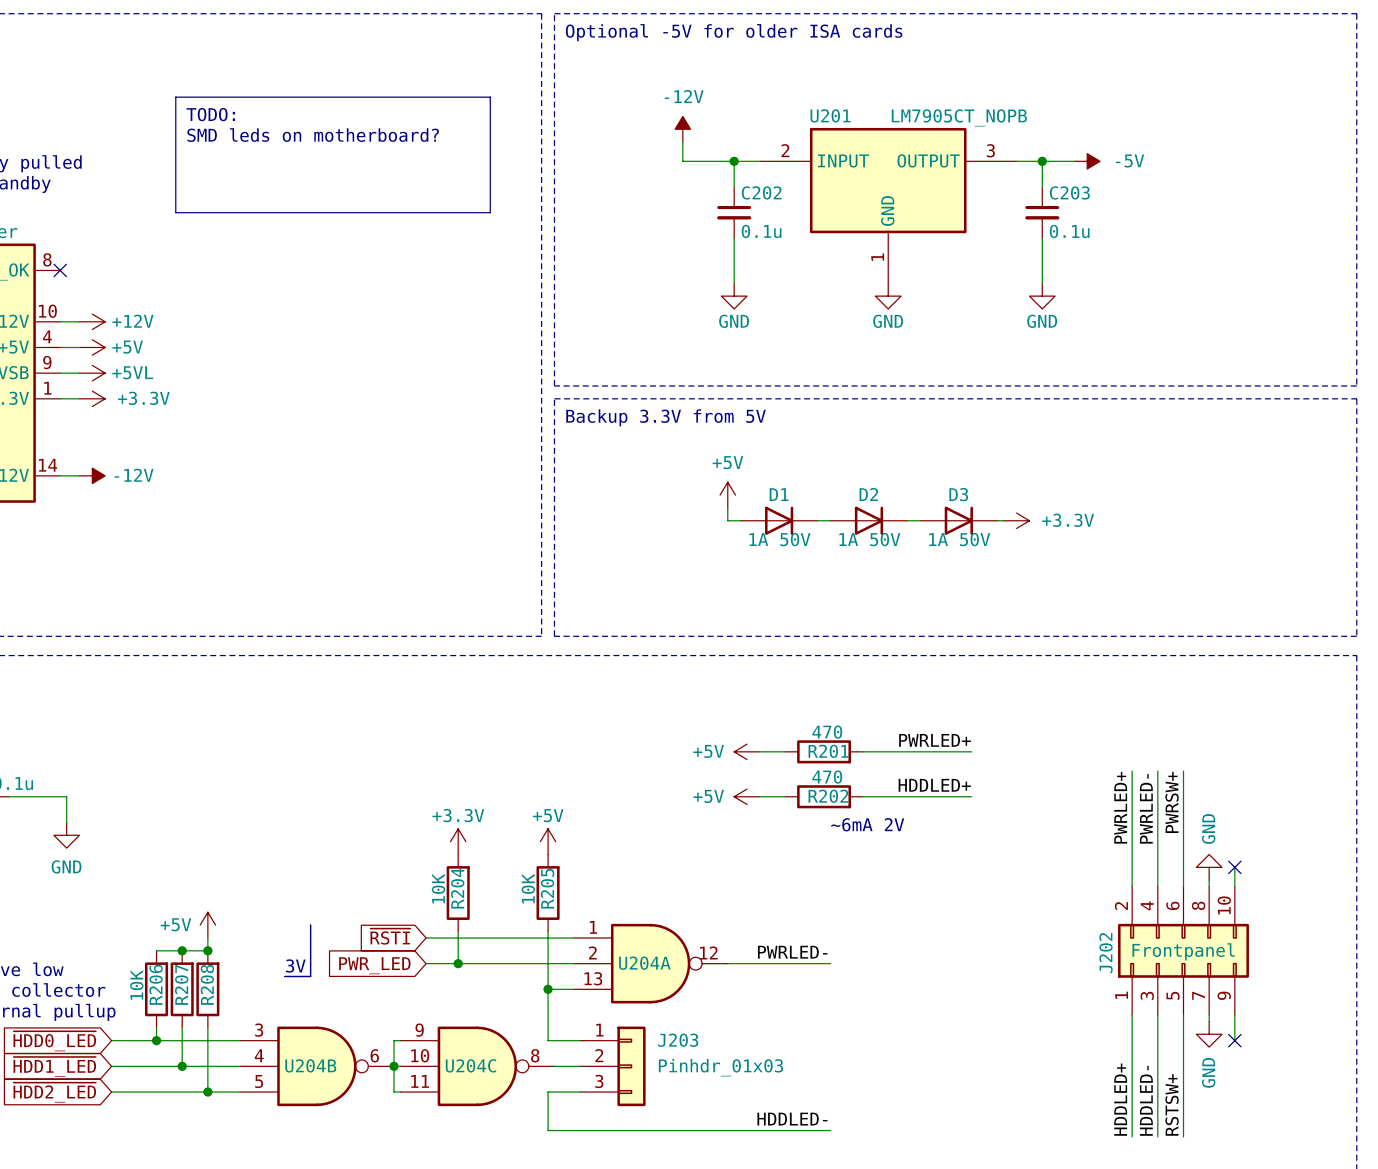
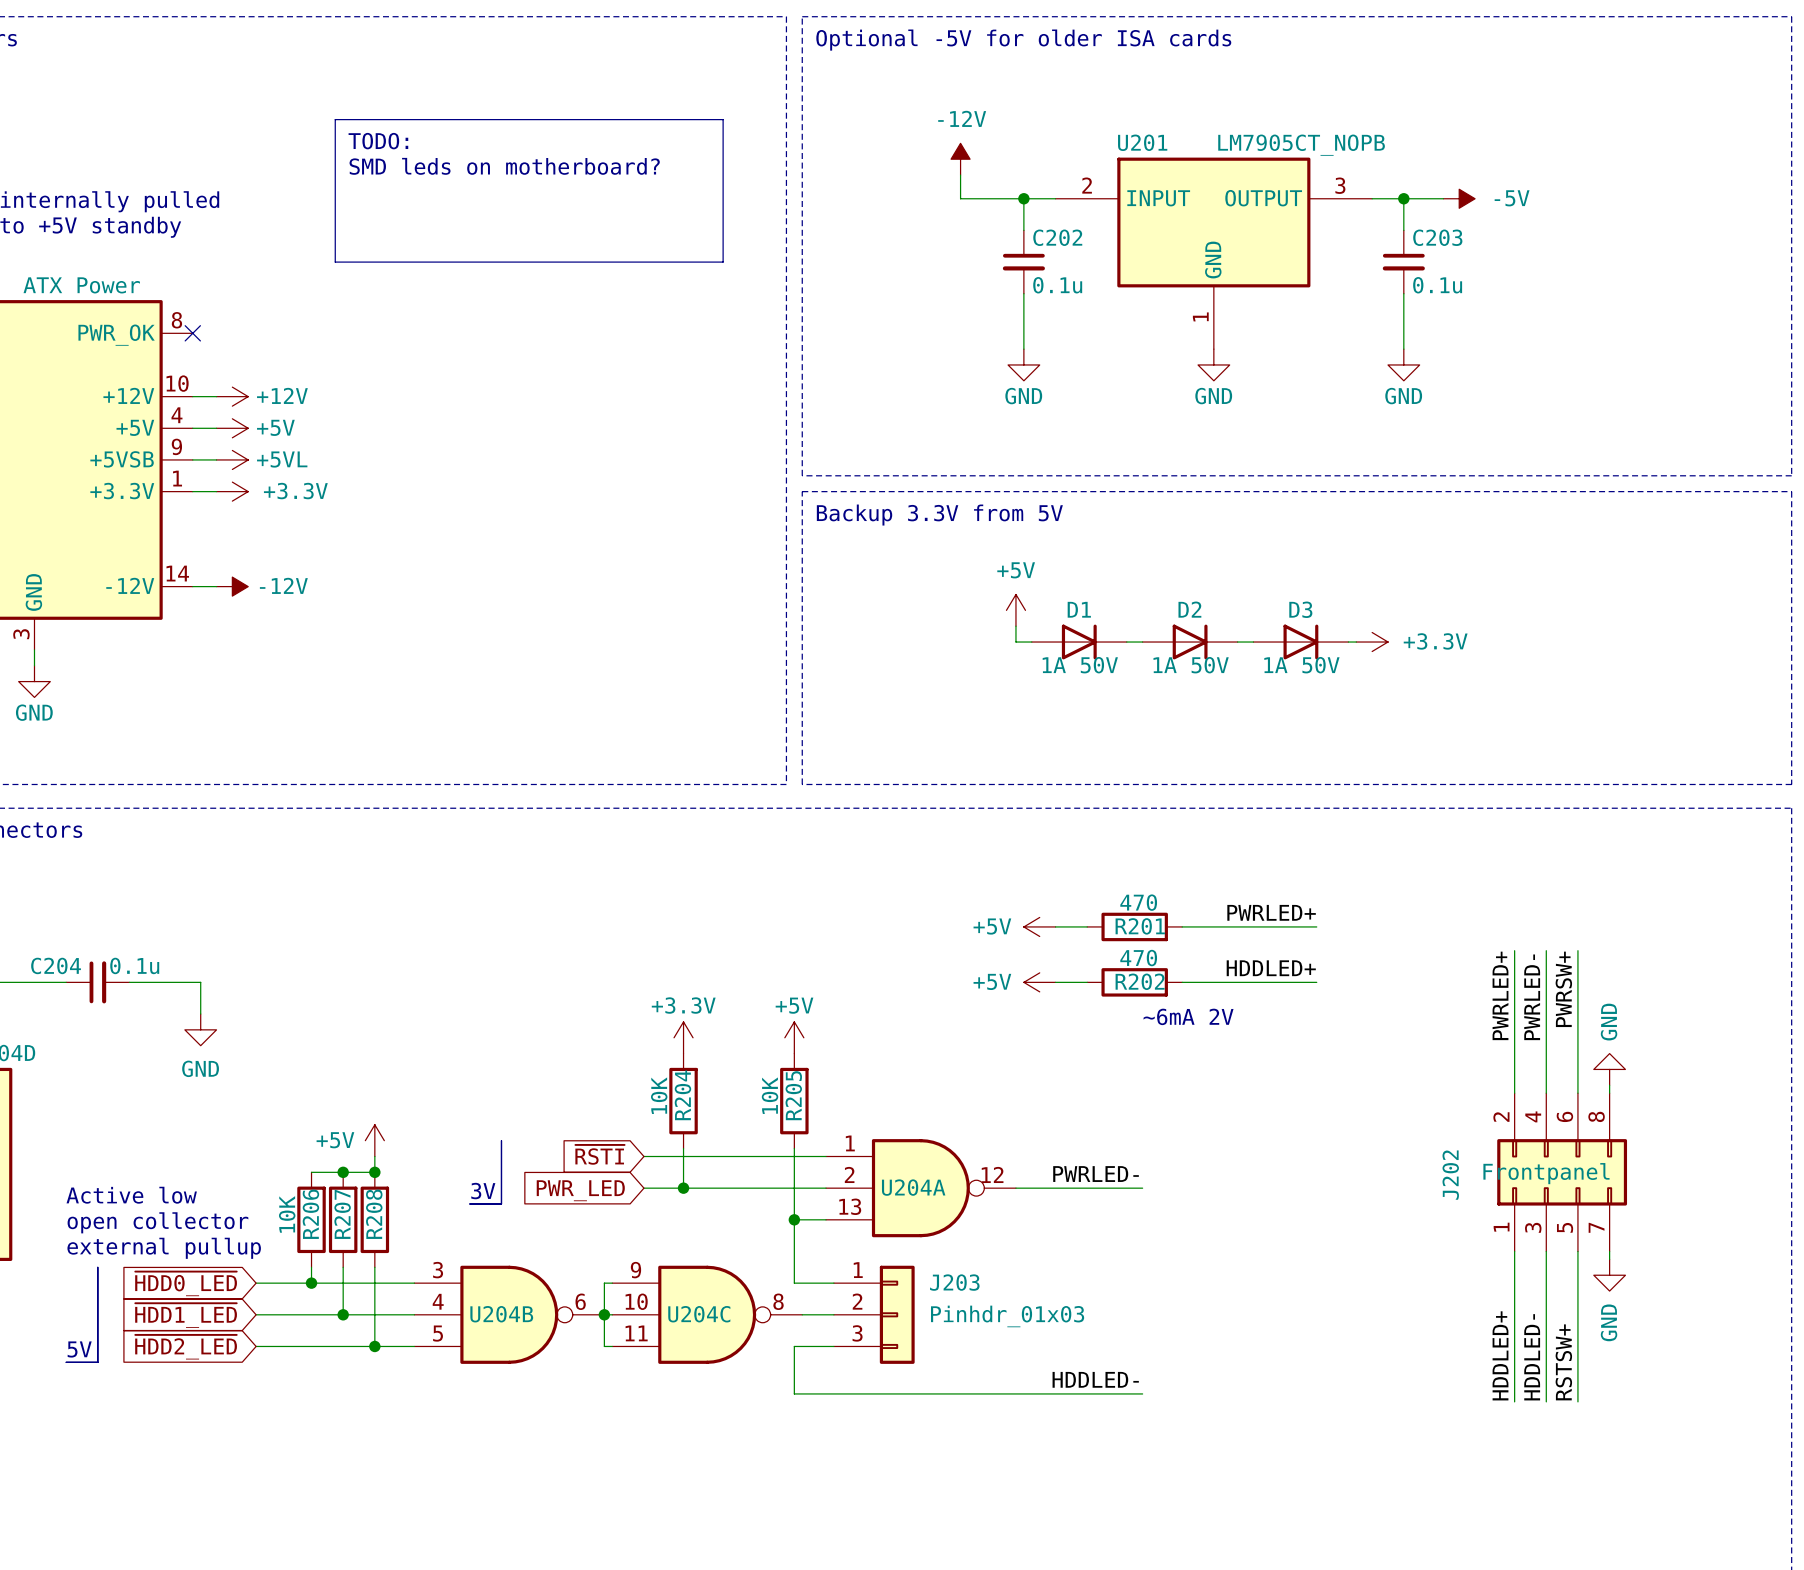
wire: (1234, 867) (1234, 886) -> none
no-connect mark: (1234, 867) -> none
J202 symbol: [1118, 886, 1249, 1016] -> [1497, 1093, 1628, 1252]
wire: (1234, 1015) (1234, 1040) -> none
no-connect mark: (1234, 1040) -> none

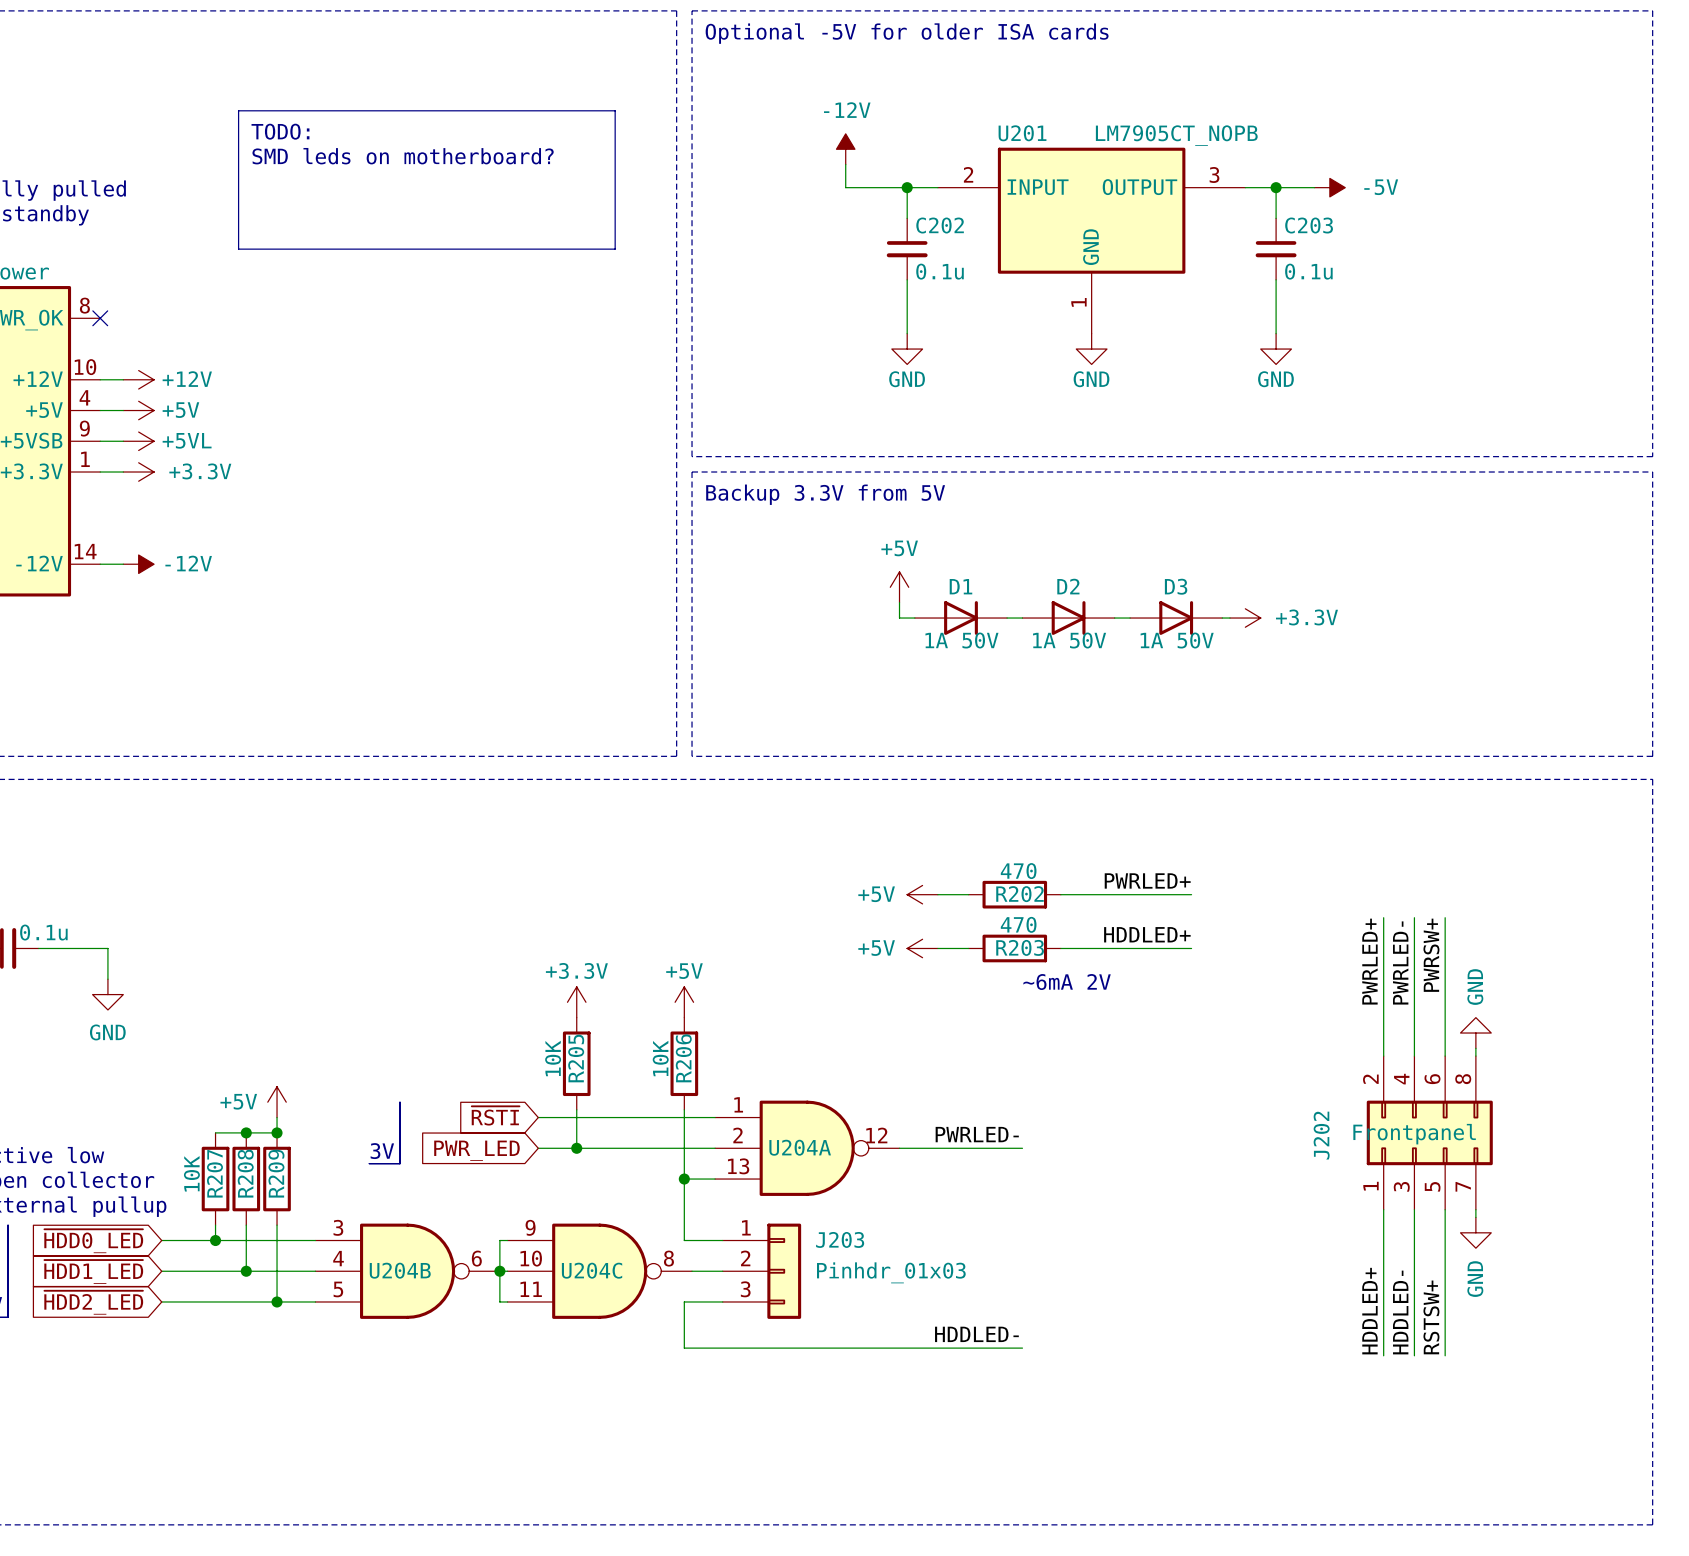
R201 name: R201 (1140, 926) -> R202 (1019, 894)
R202 name: R202 (1140, 981) -> R203 (1020, 947)
R204 name: R204 (682, 1095) -> R205 (576, 1058)
R205 name: R205 (793, 1095) -> R206 (683, 1058)
R206 name: R206 (310, 1214) -> R207 (214, 1173)
R207 name: R207 (342, 1214) -> R208 (245, 1173)
R208 name: R208 (374, 1214) -> R209 (276, 1173)

